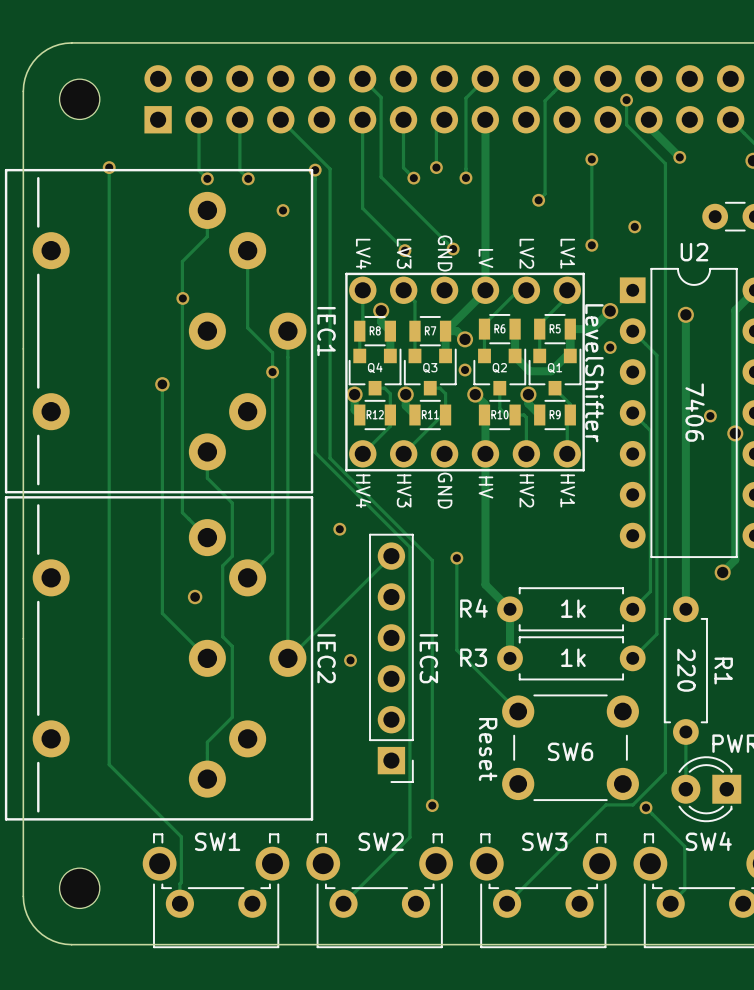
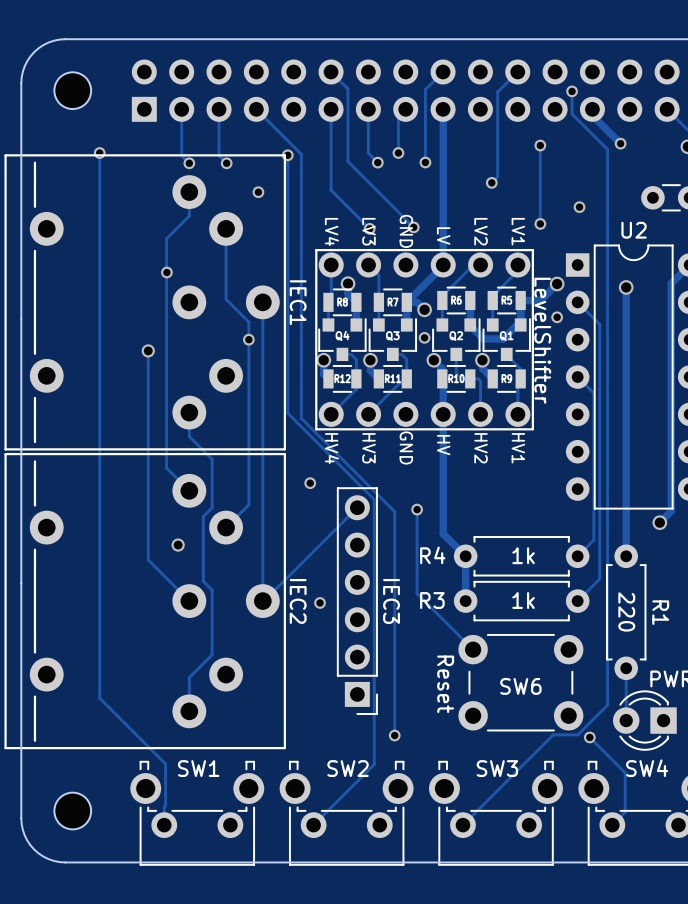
U2 value: 7406 (695, 412) -> none
via: (710, 416) -> none
via: (735, 433) -> none

